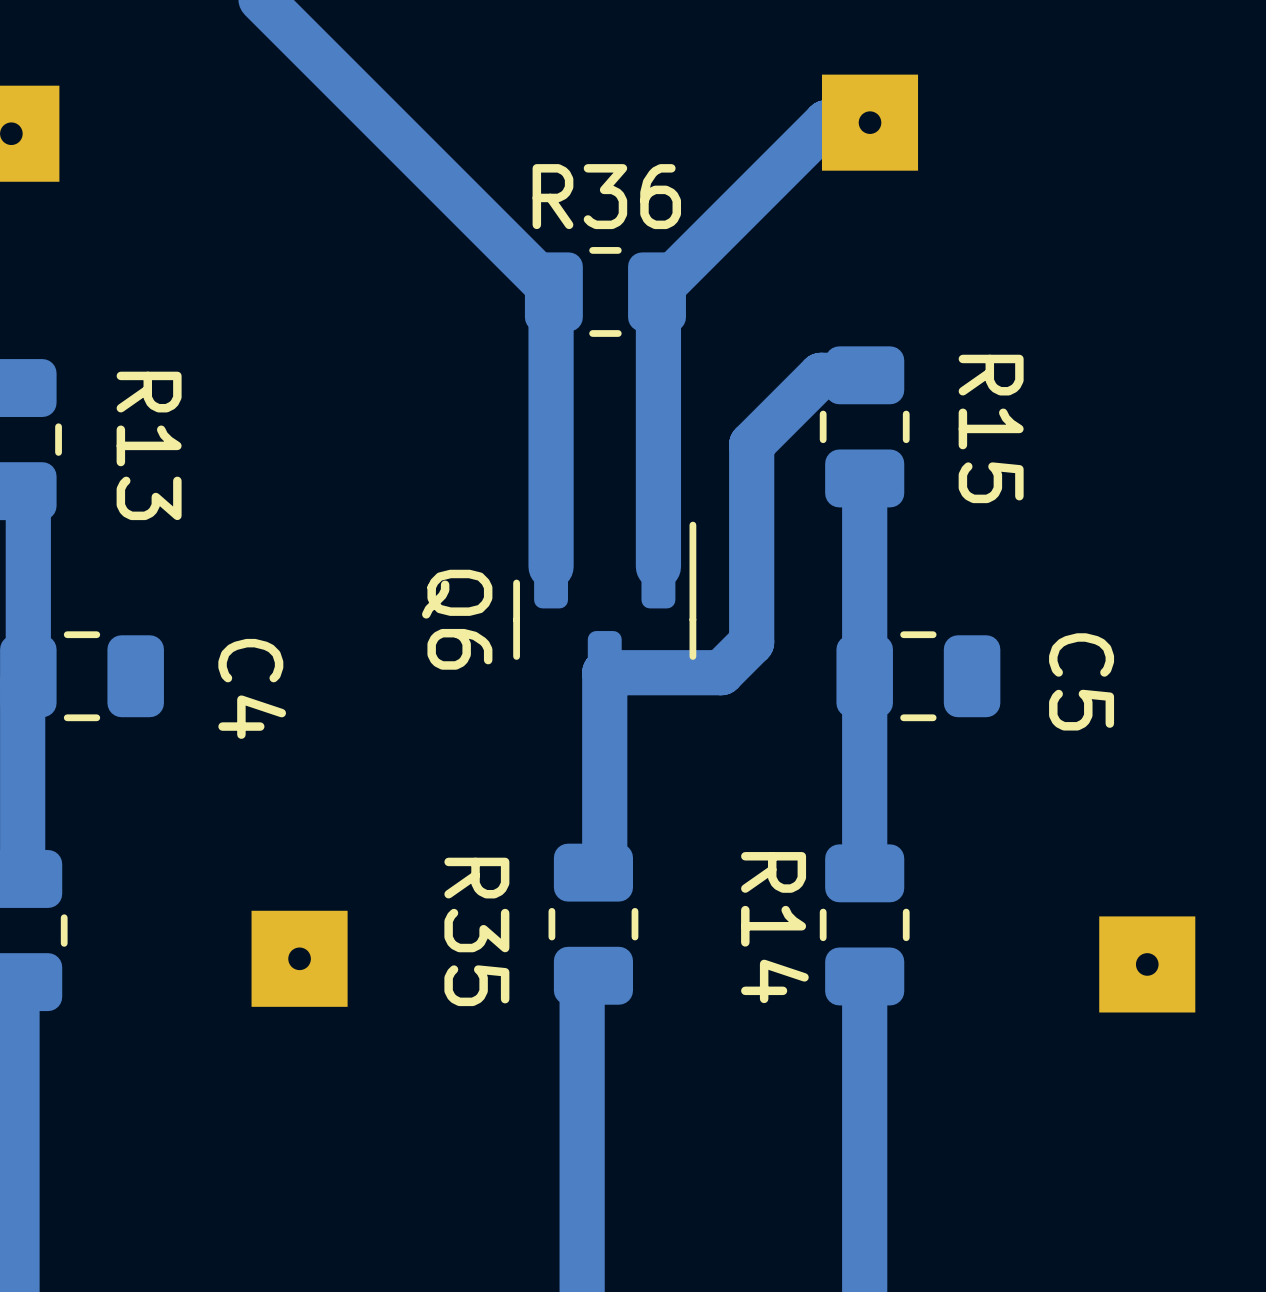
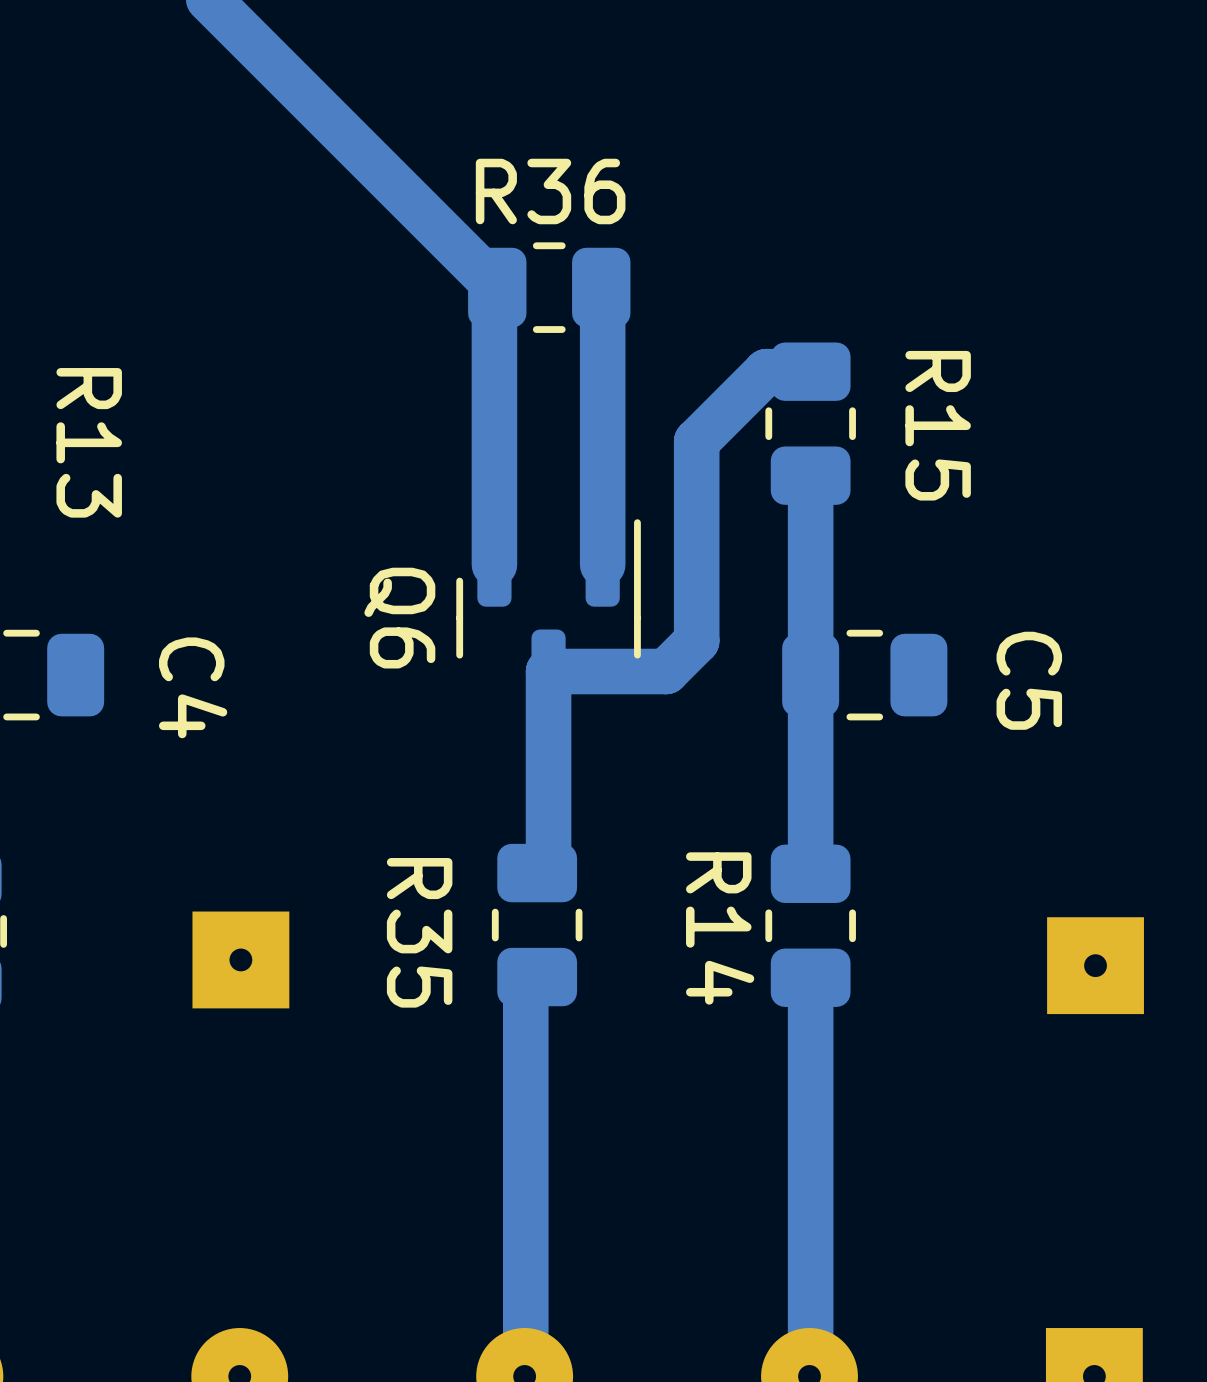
bottom track: (870, 122) (826, 122) (657, 291) -> none
part: (870, 122) -> none

